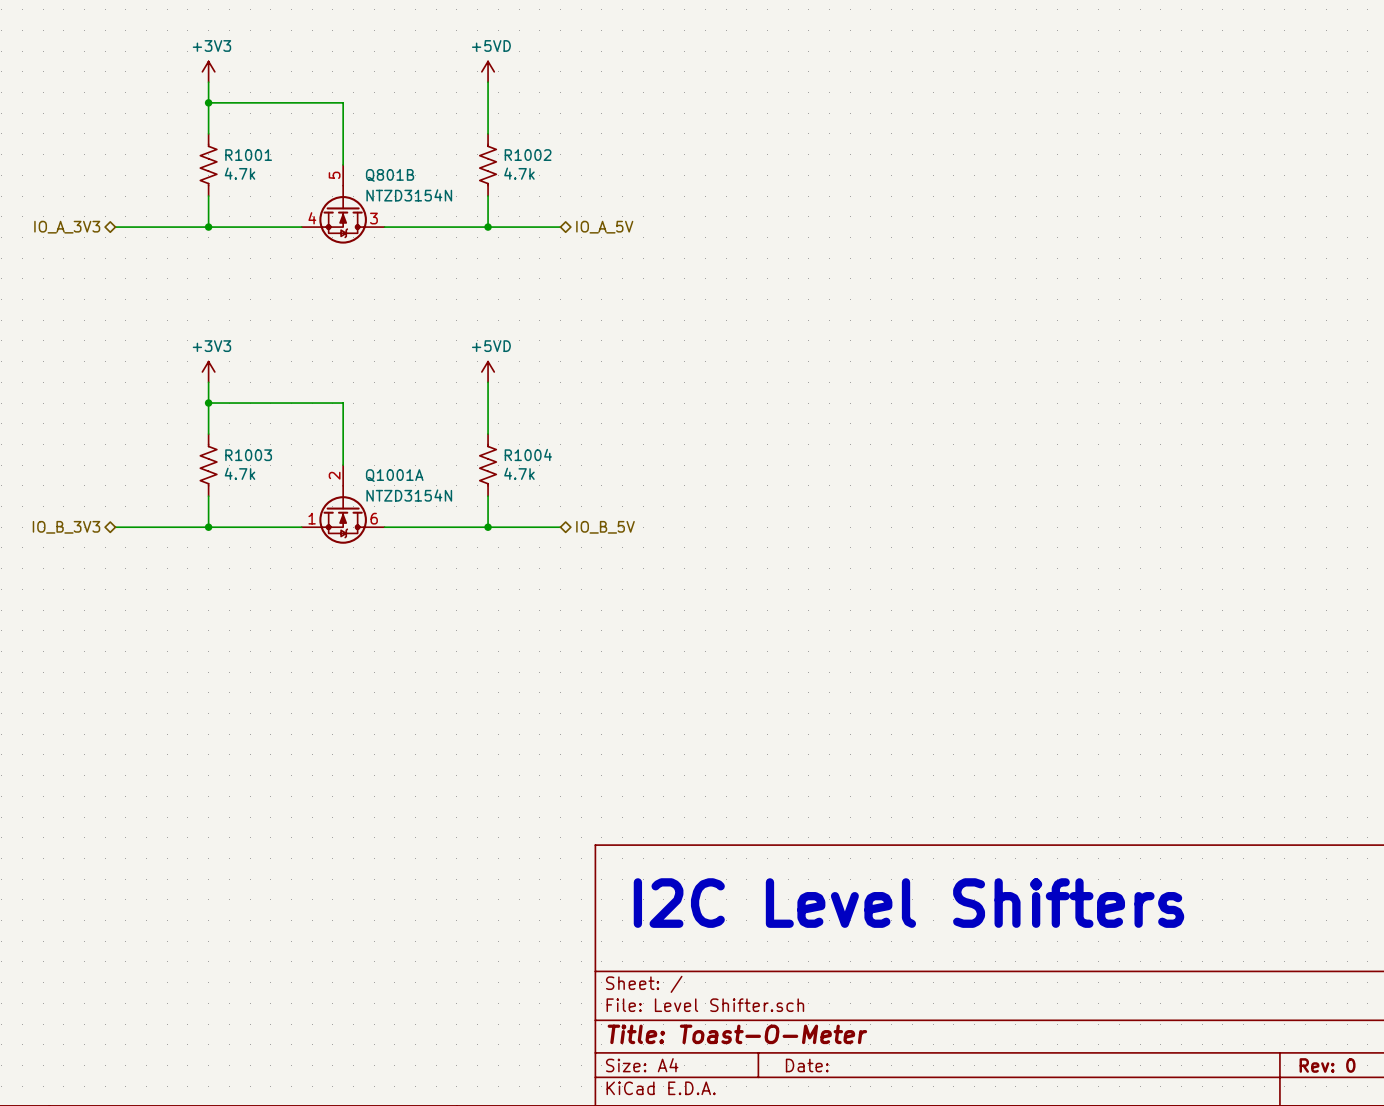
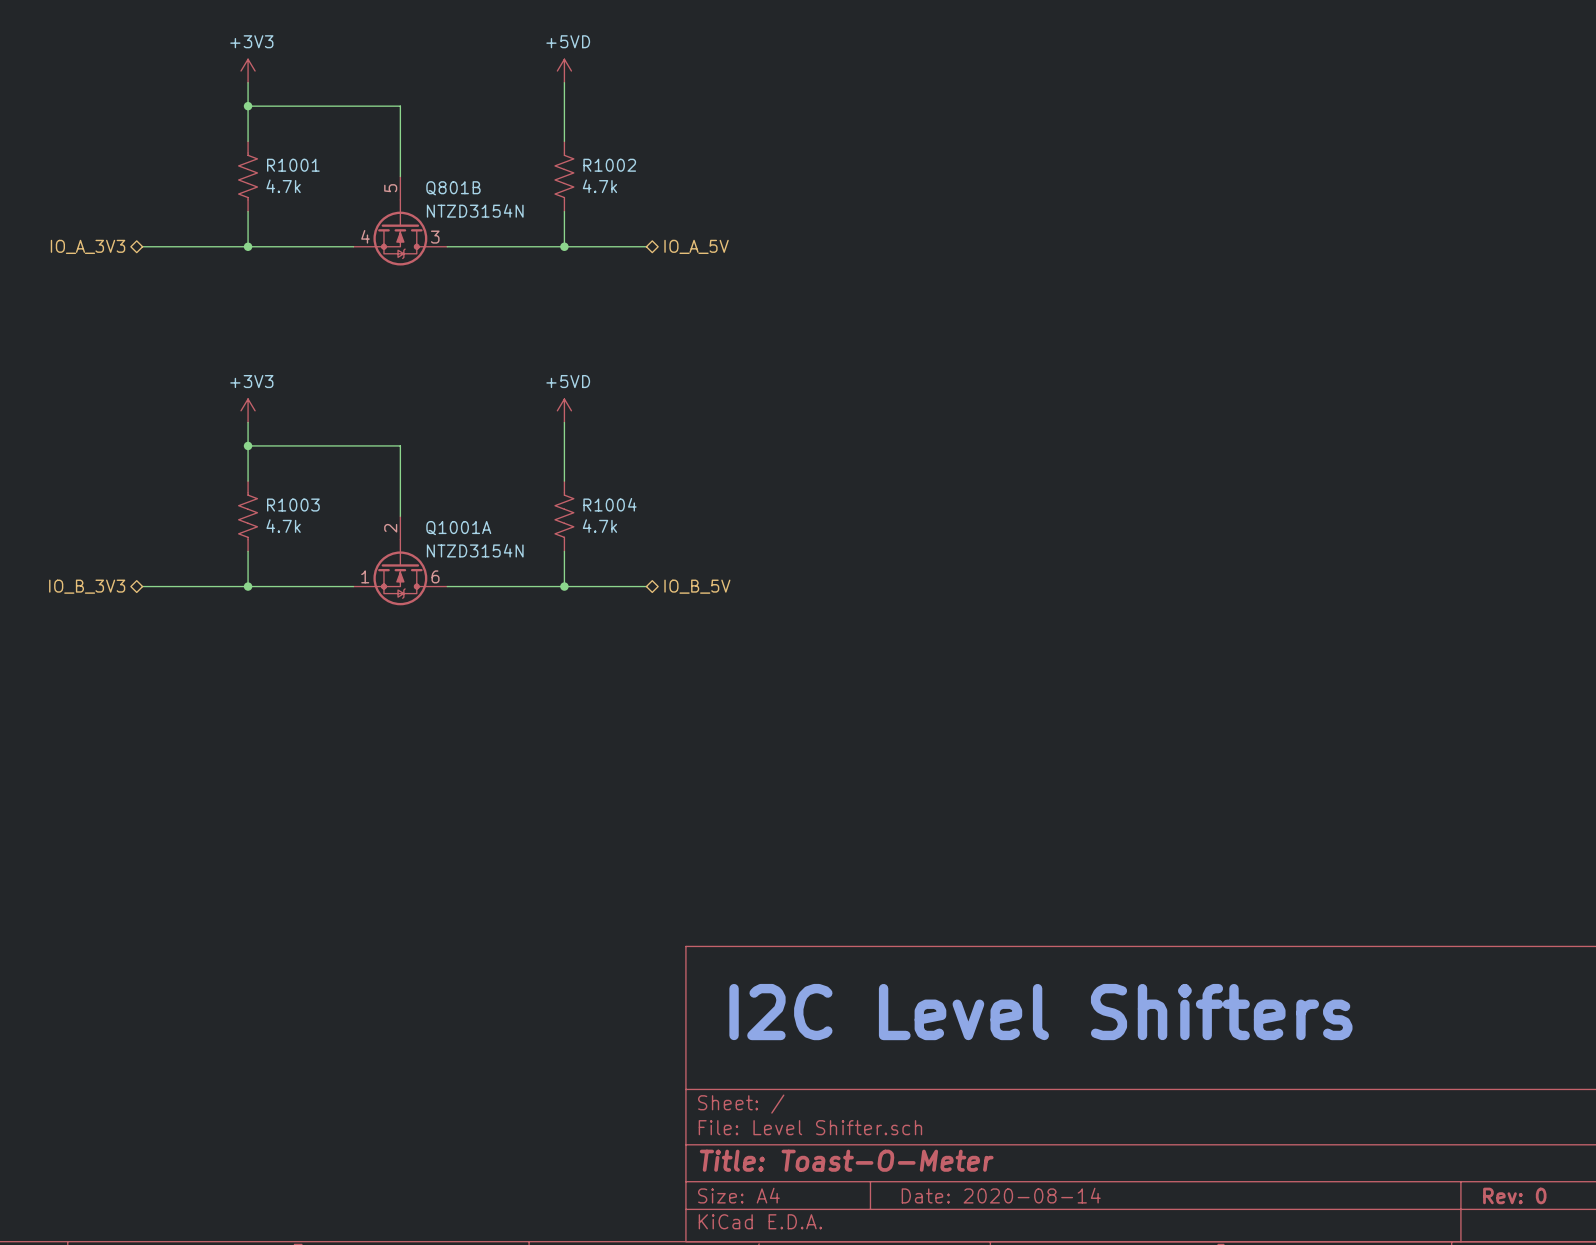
title block: Date: (807, 1065) -> Date: 2020-08-14 (1001, 1195)

